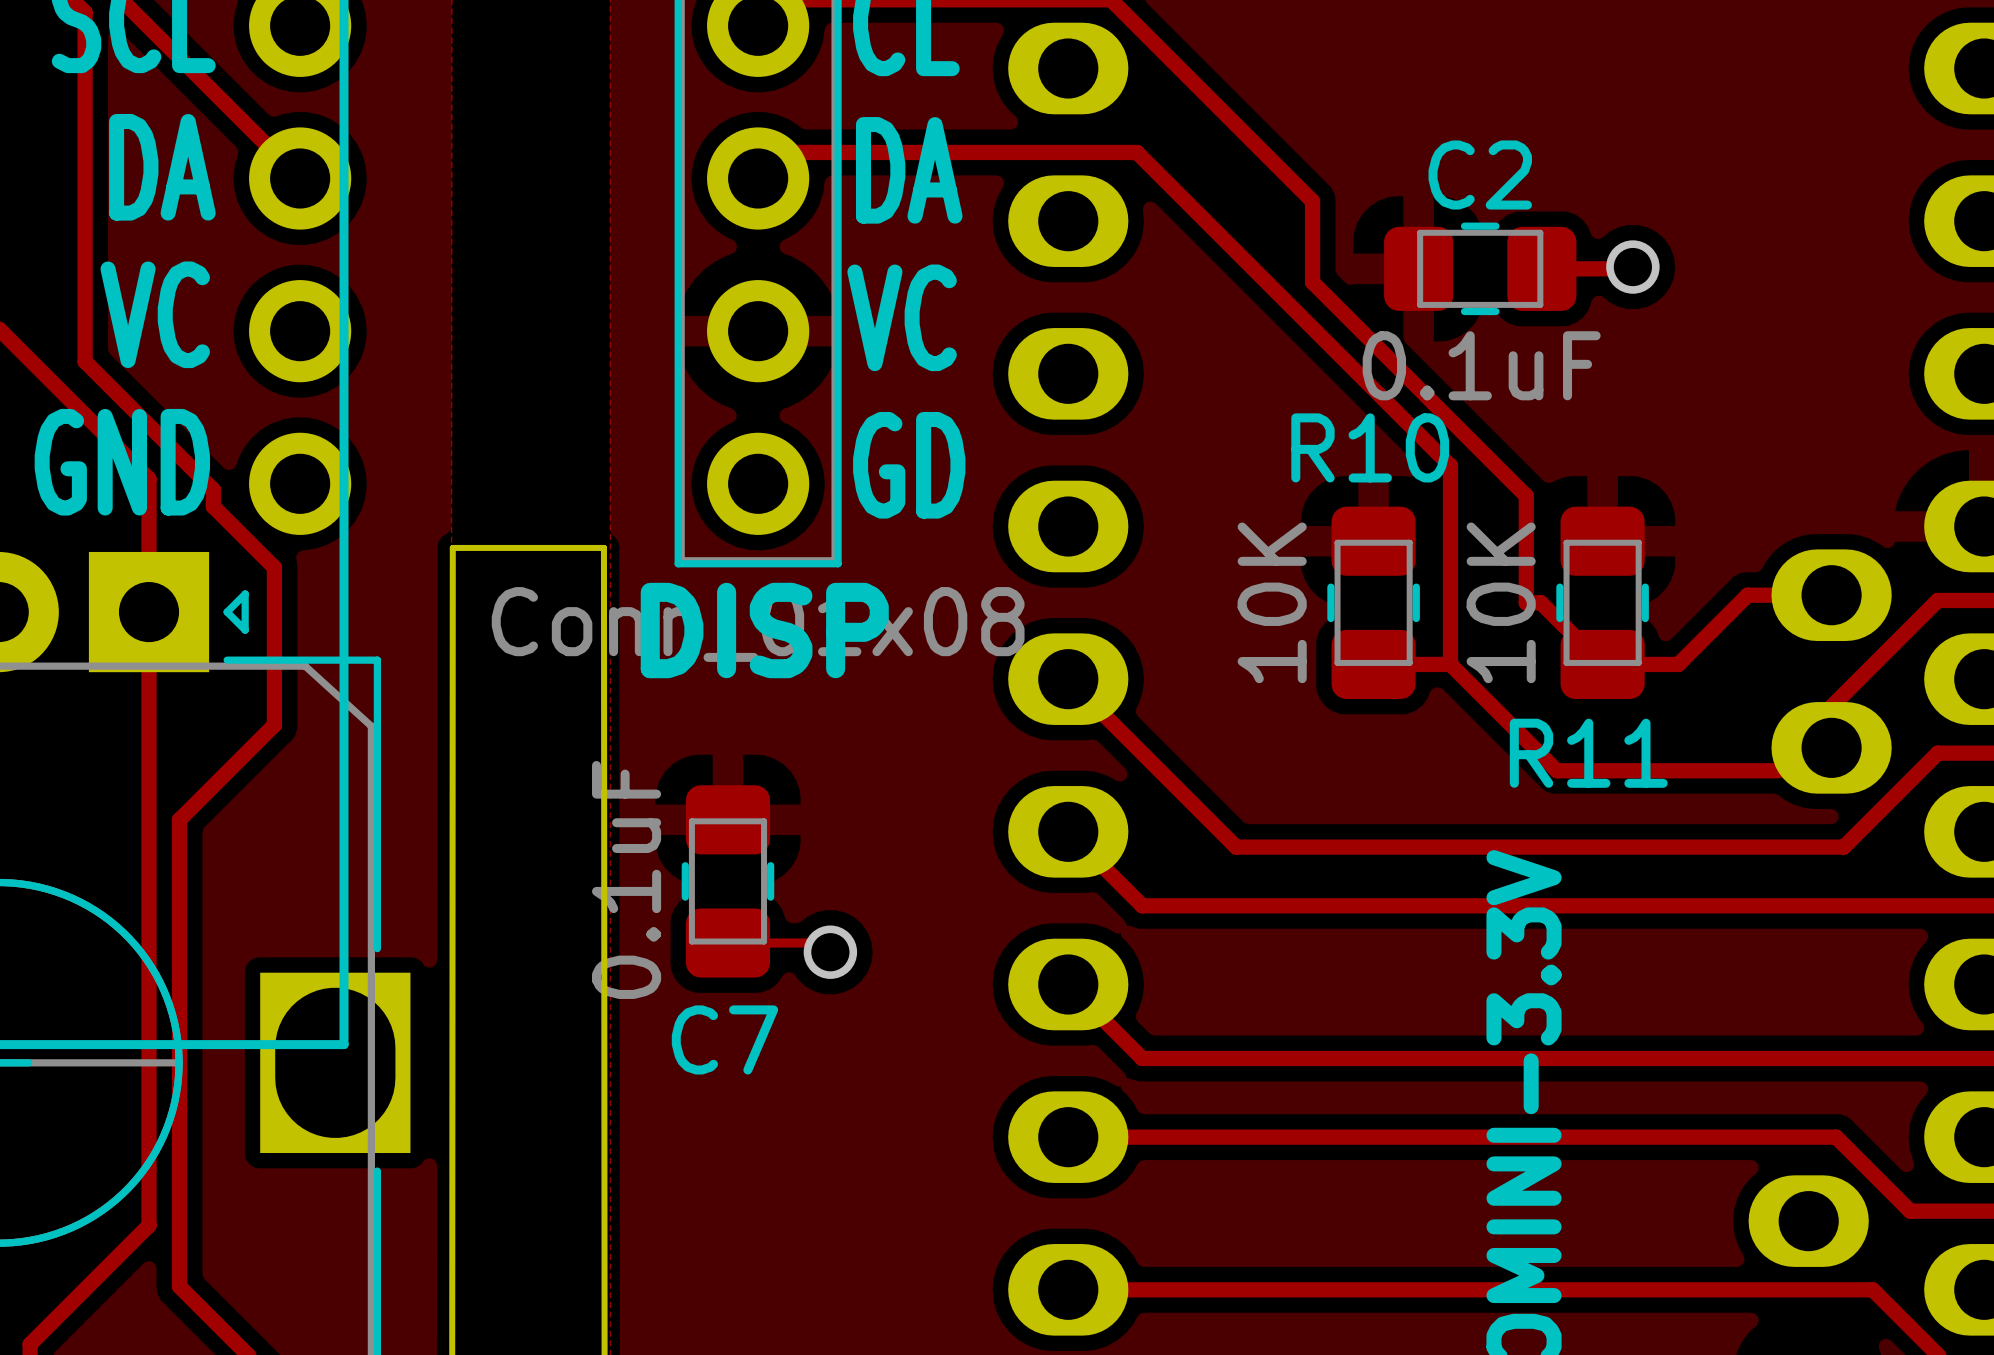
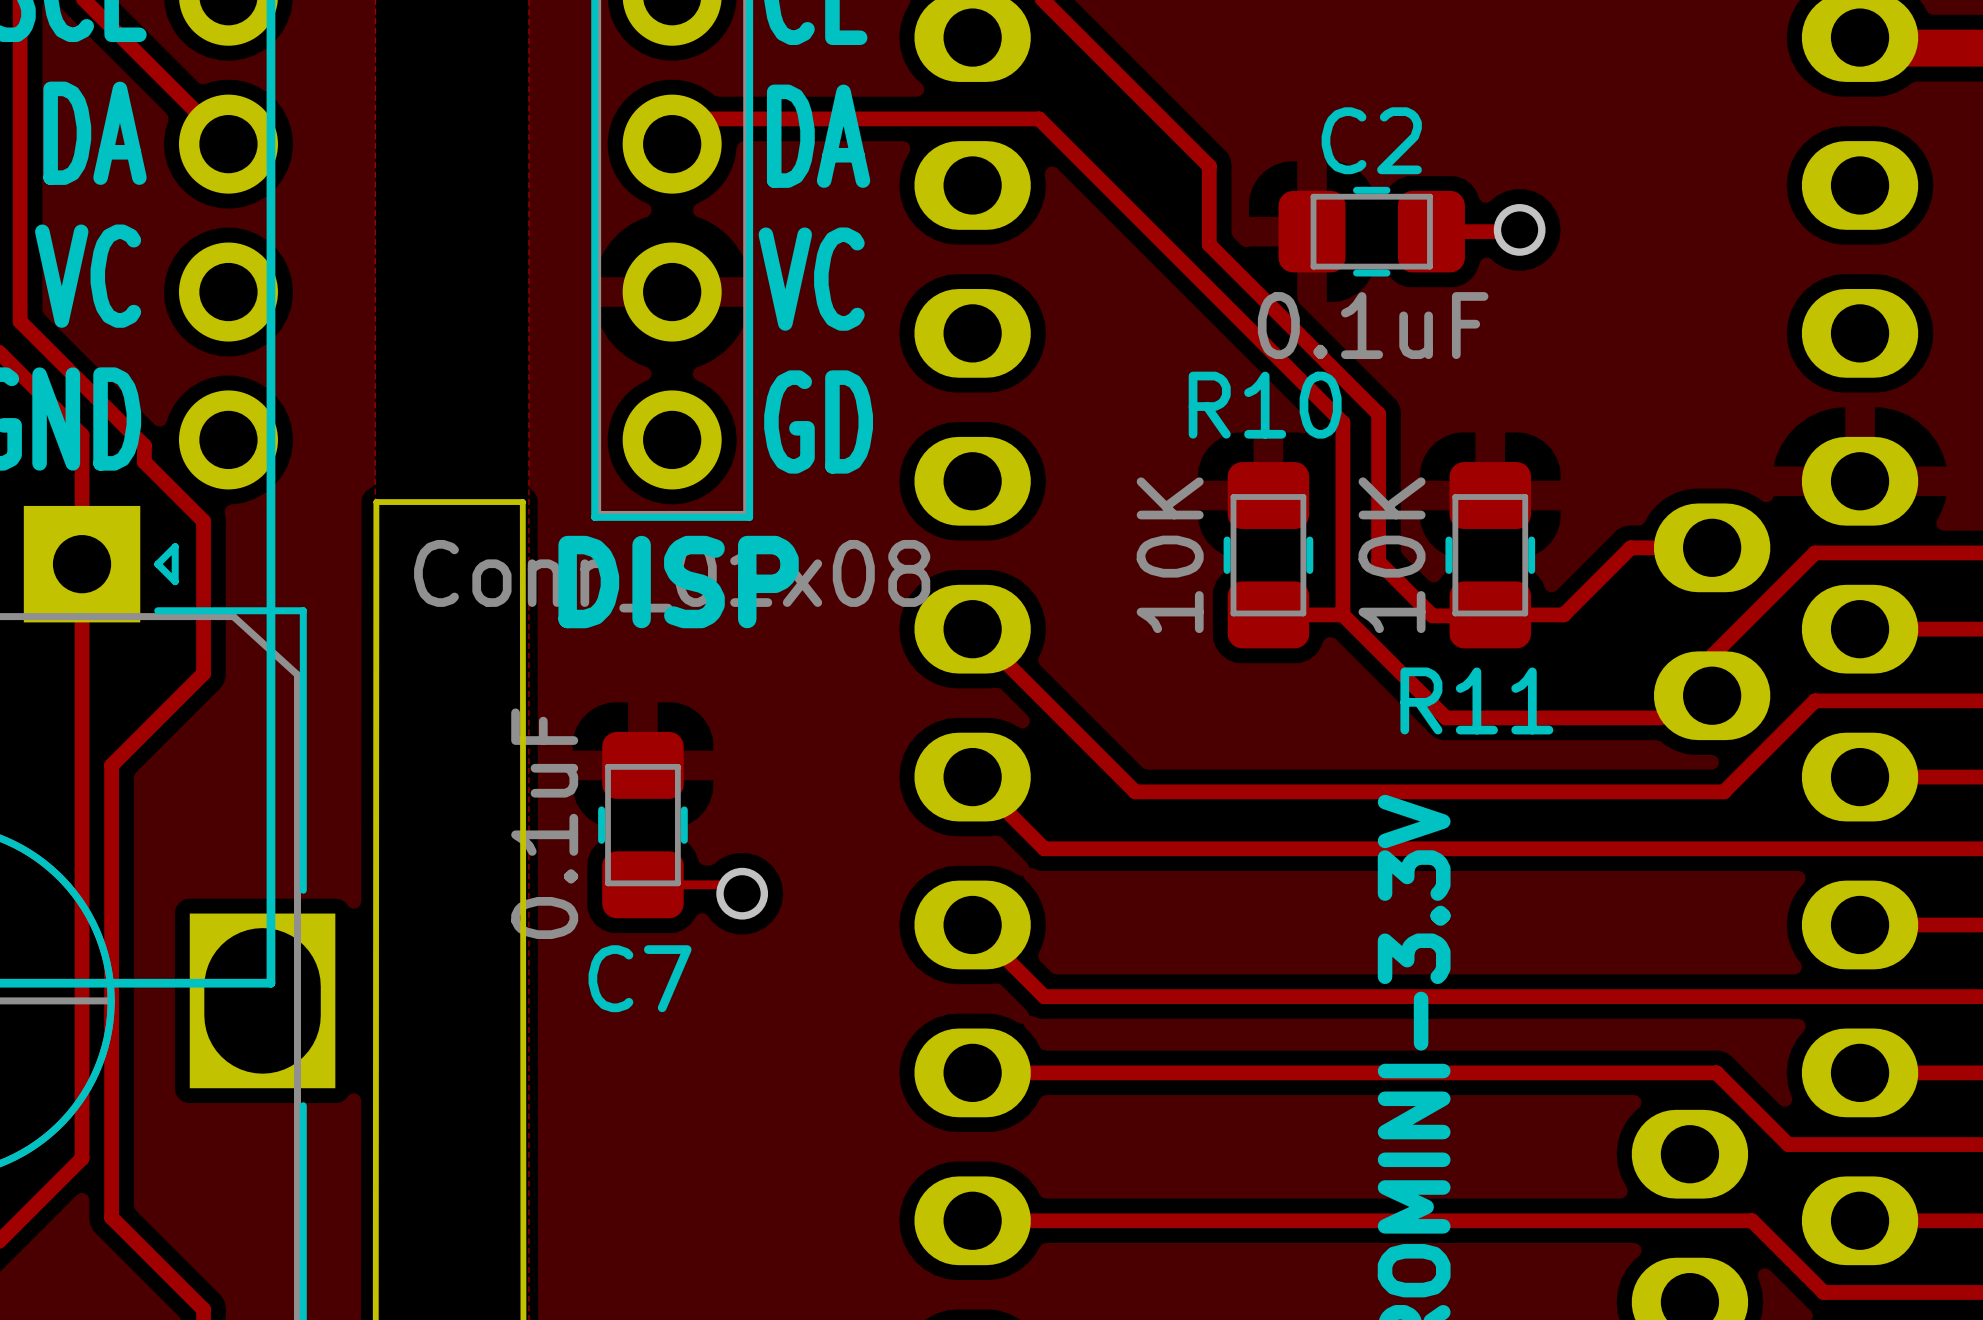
track: (1487, 457) (1526, 495) (1526, 602) (1540, 602) (1602, 664) -> (1378, 413) (1378, 561) (1432, 615) (1490, 614)

